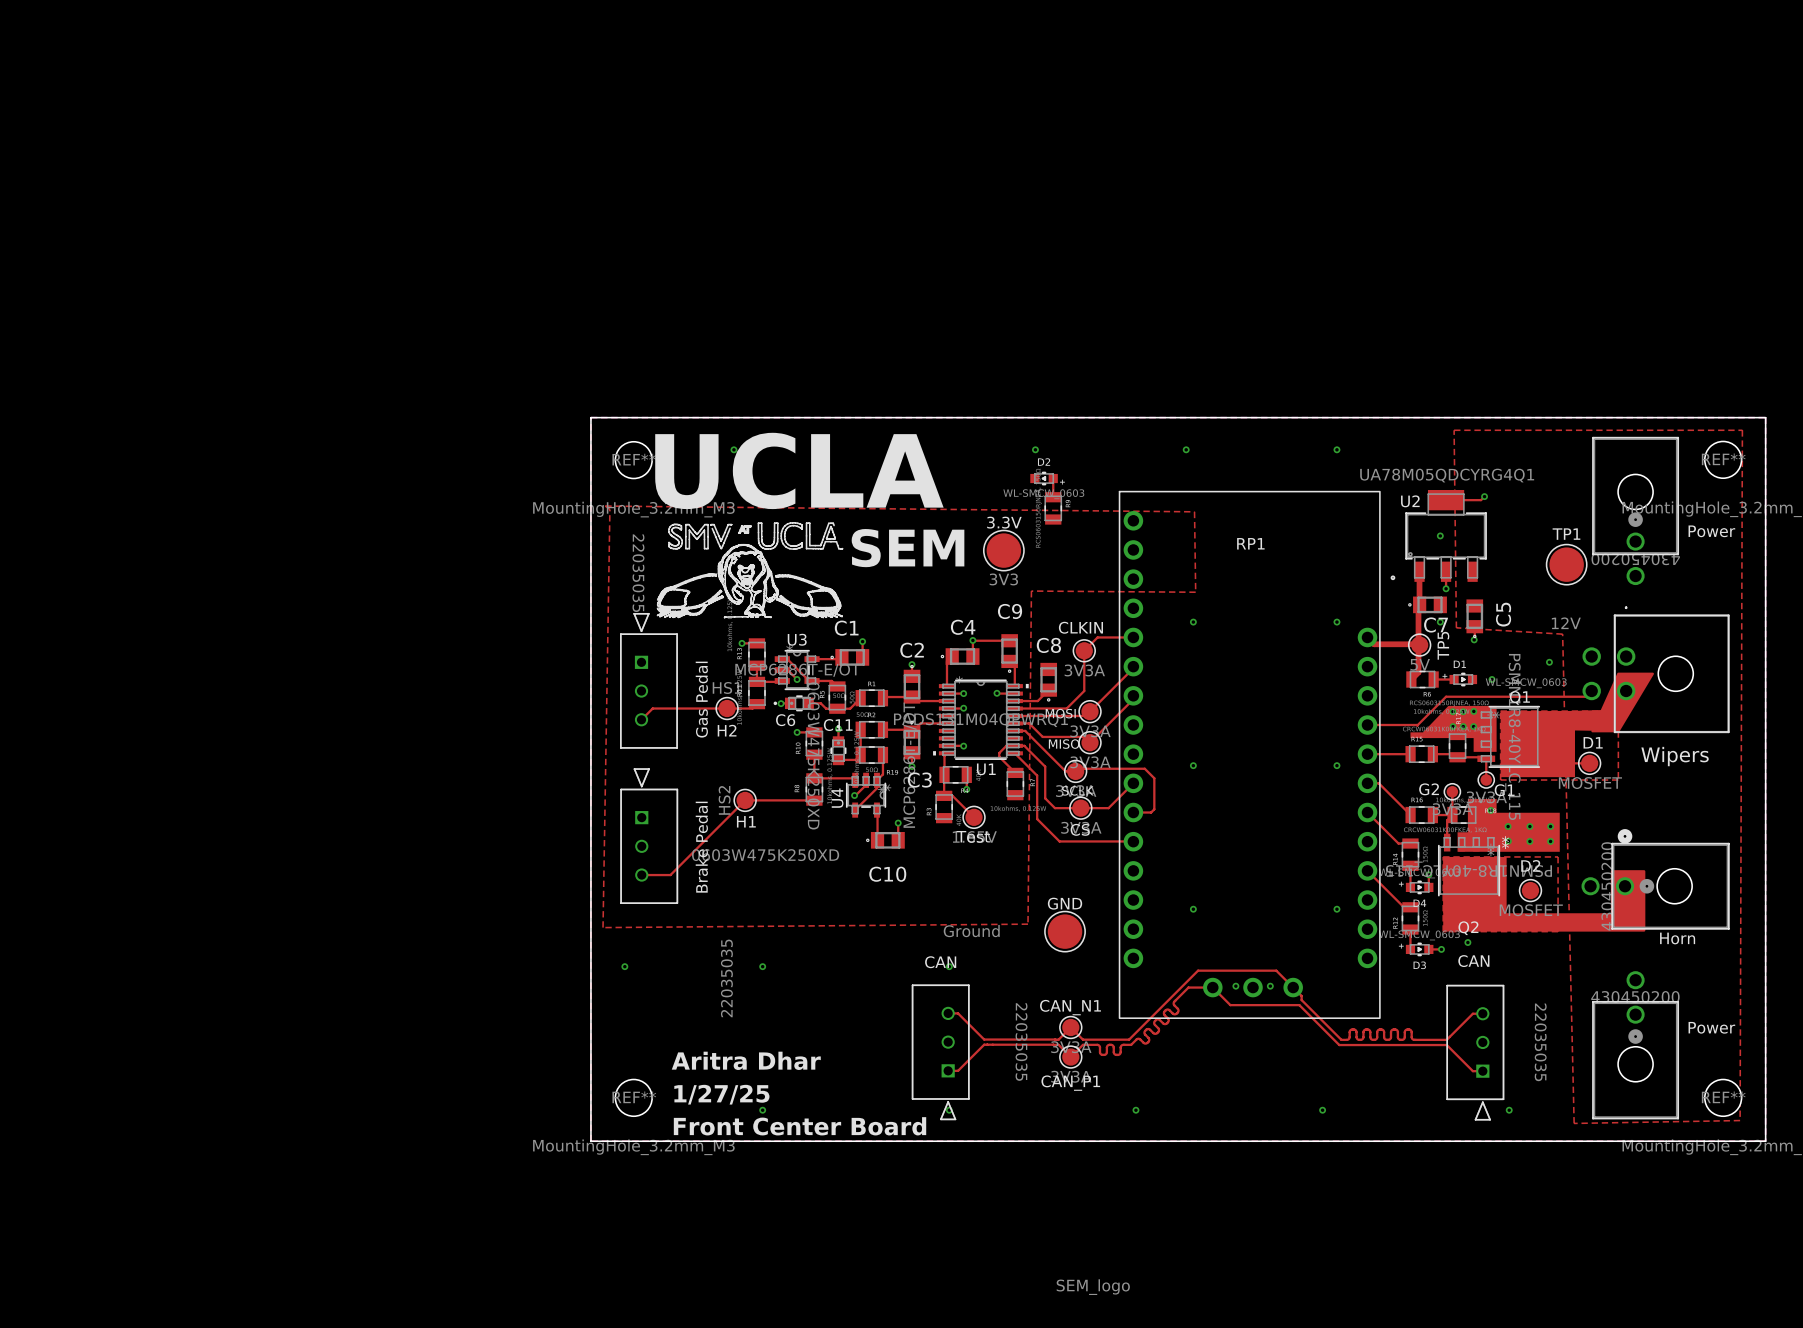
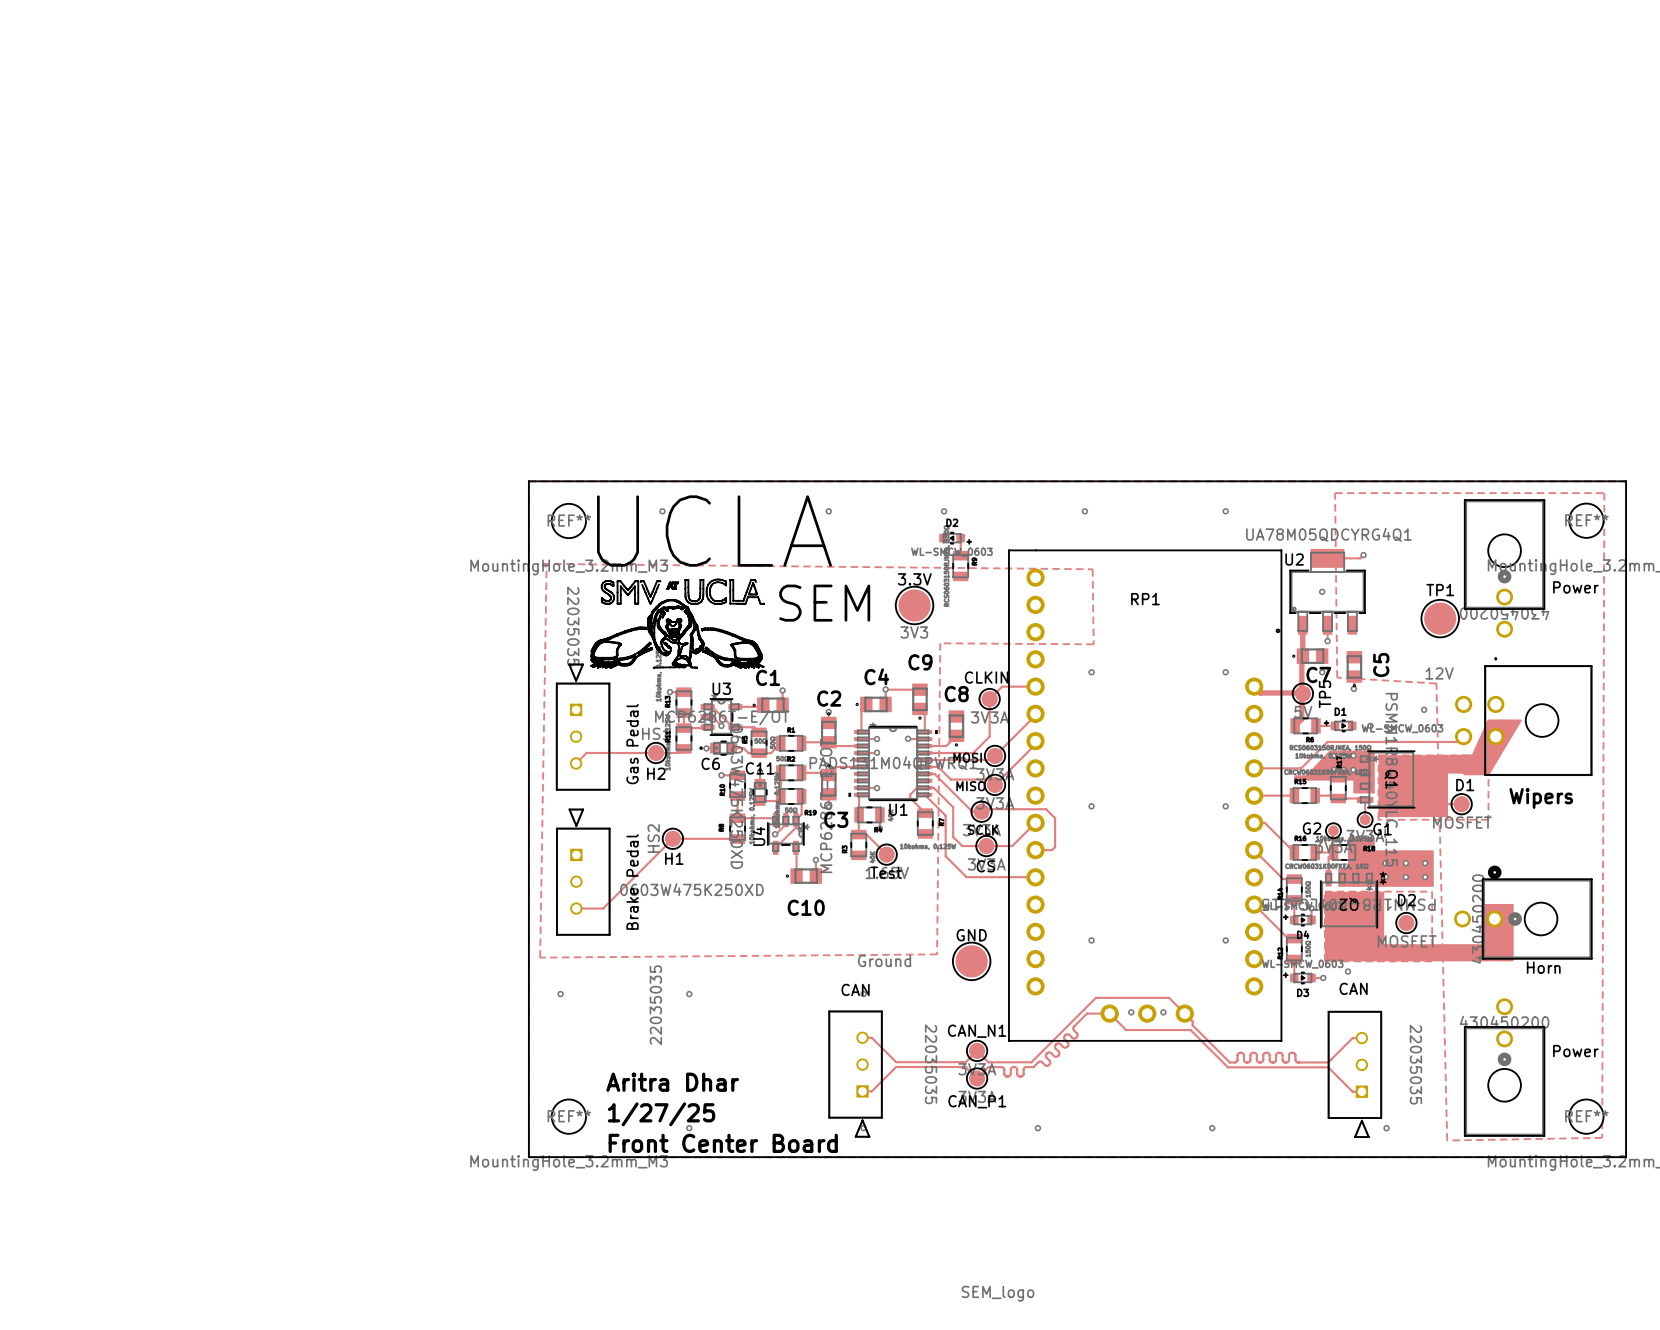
RP1 footprint: [1118, 491, 1381, 1019] -> [1008, 549, 1282, 1042]
Q1 name rotation: 0° (1519, 697) -> 90° clockwise (1391, 779)
Q1 name position: Q1 (1519, 697) -> Q1 (1391, 779)
Q2 name rotation: 0° (1468, 928) -> 180° (1349, 904)
Q2 name position: Q2 (1468, 928) -> Q2 (1349, 904)

